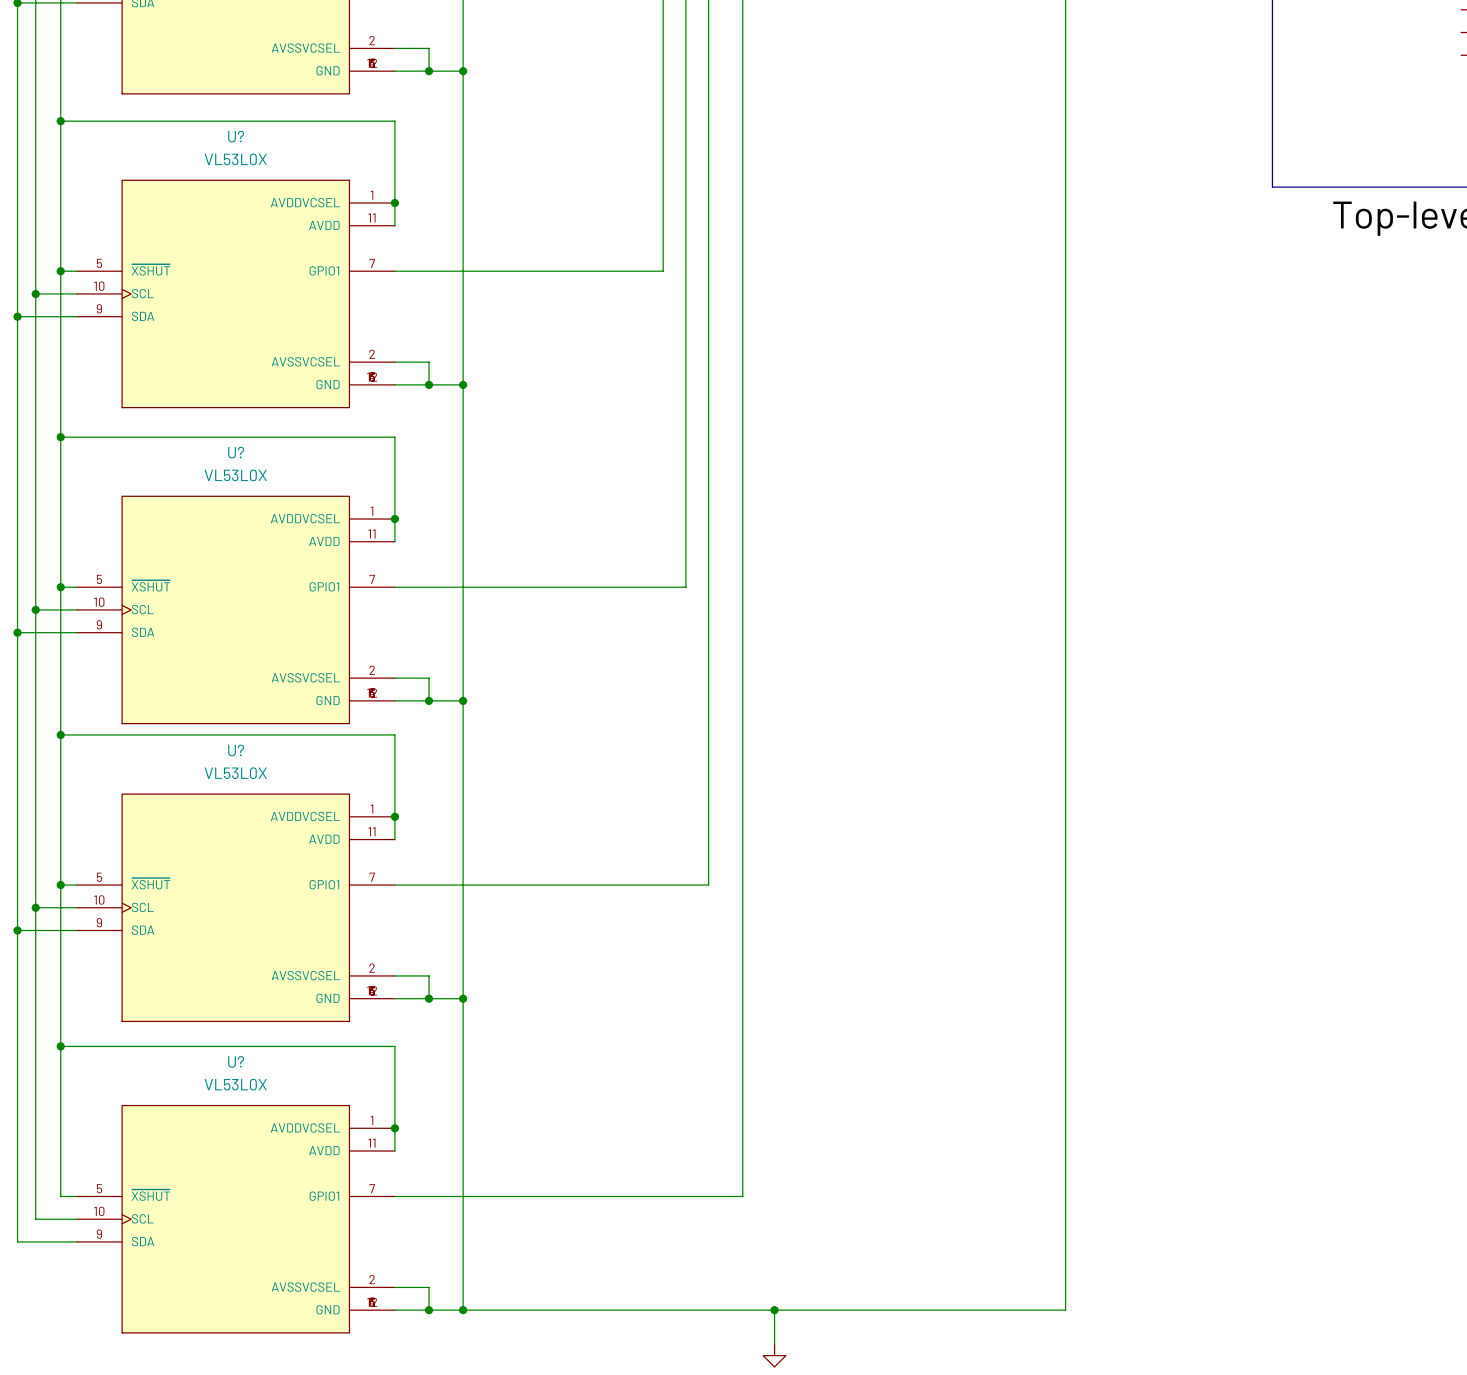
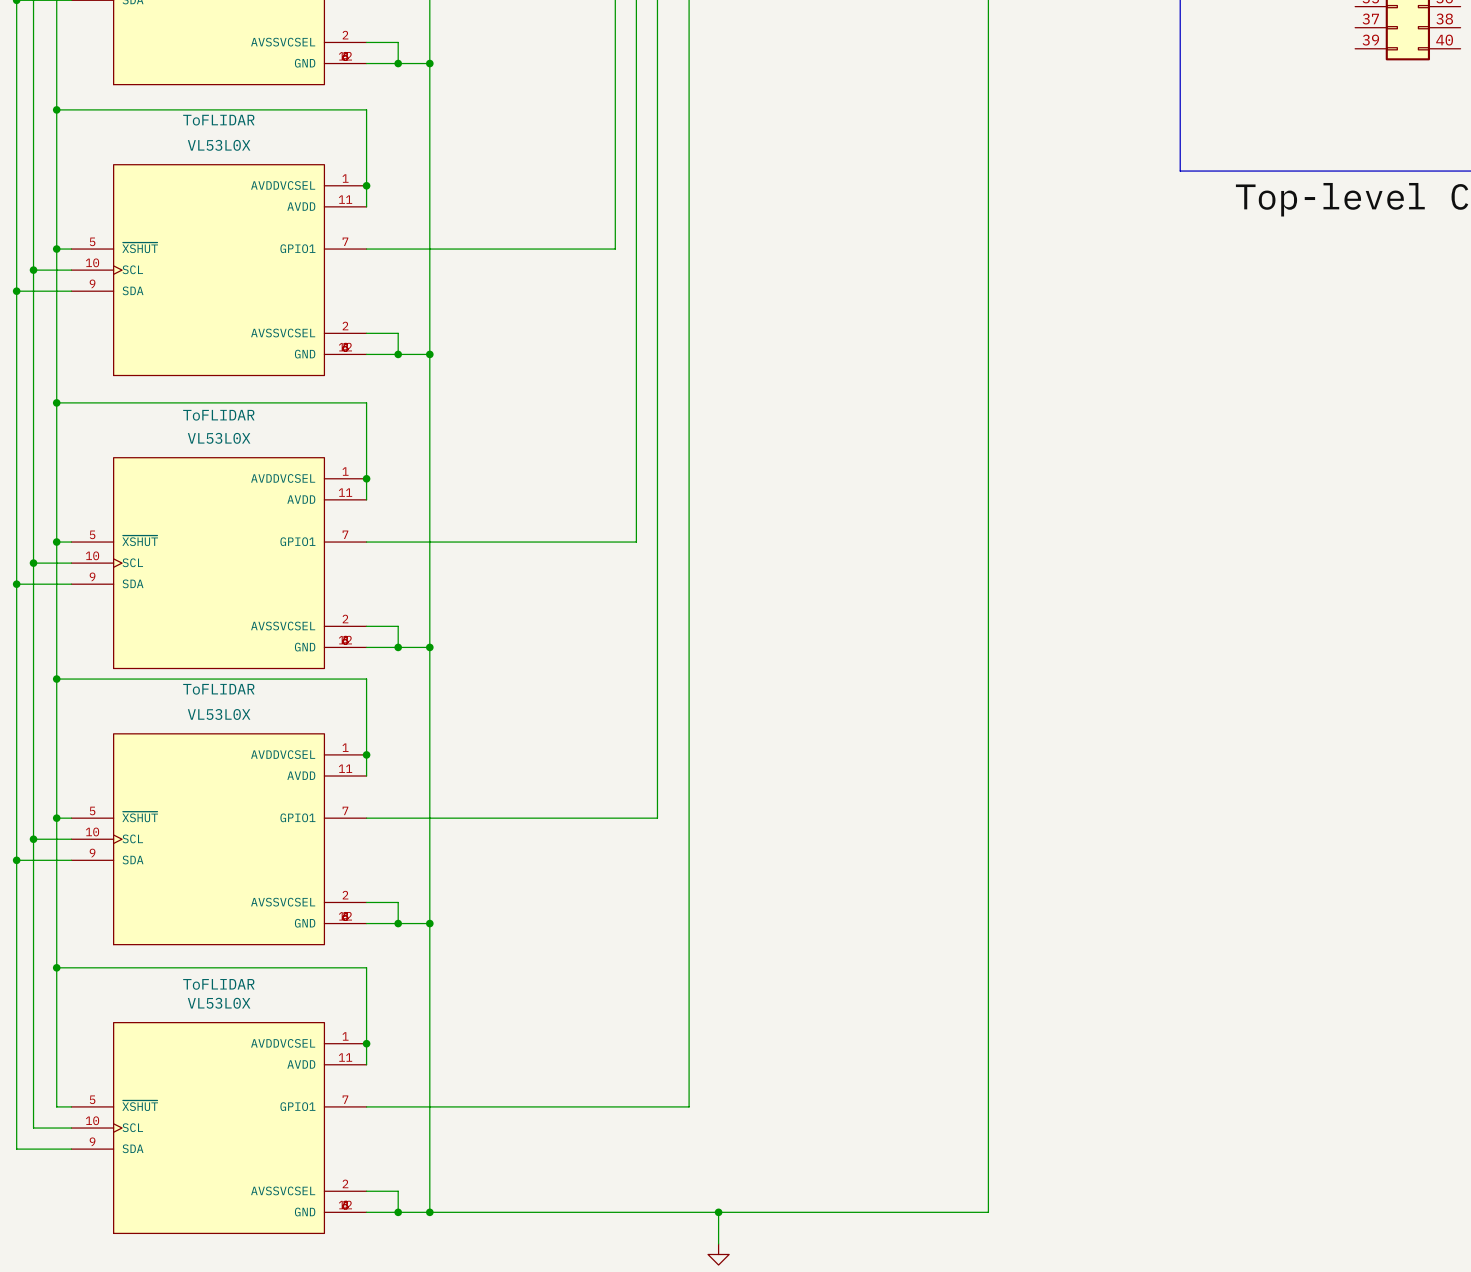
U? name: U? (236, 136) -> ToFLIDAR (218, 120)
U? name: U? (236, 452) -> ToFLIDAR (218, 415)
U? name: U? (236, 750) -> ToFLIDAR (218, 689)
U? name: U? (236, 1061) -> ToFLIDAR (218, 984)

